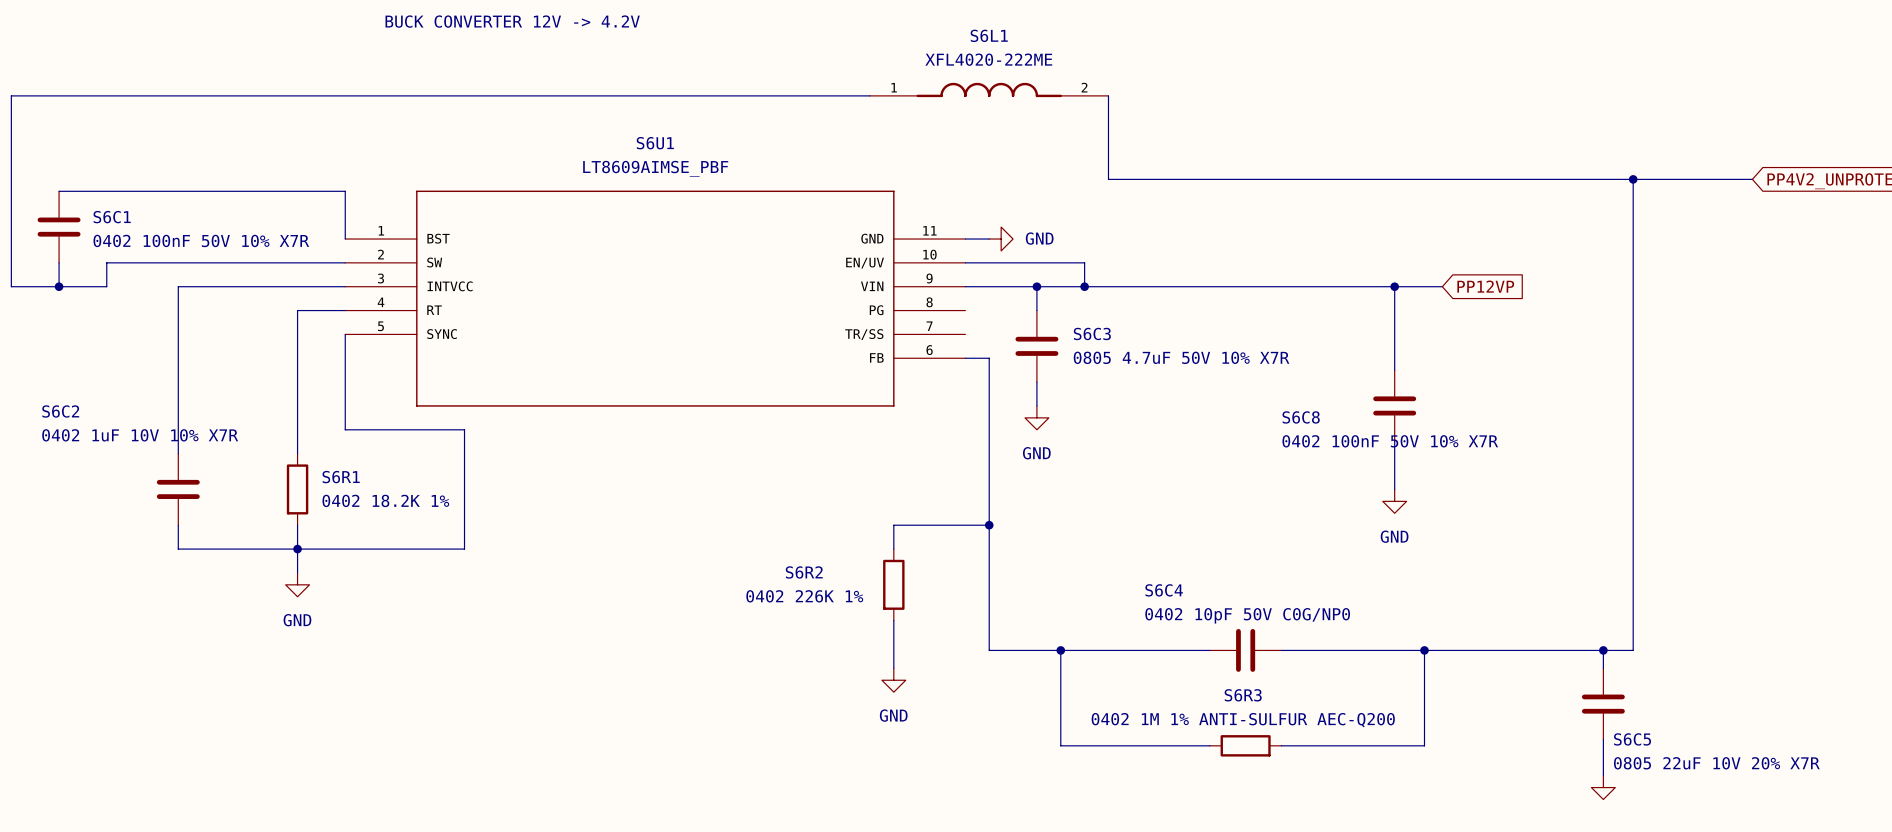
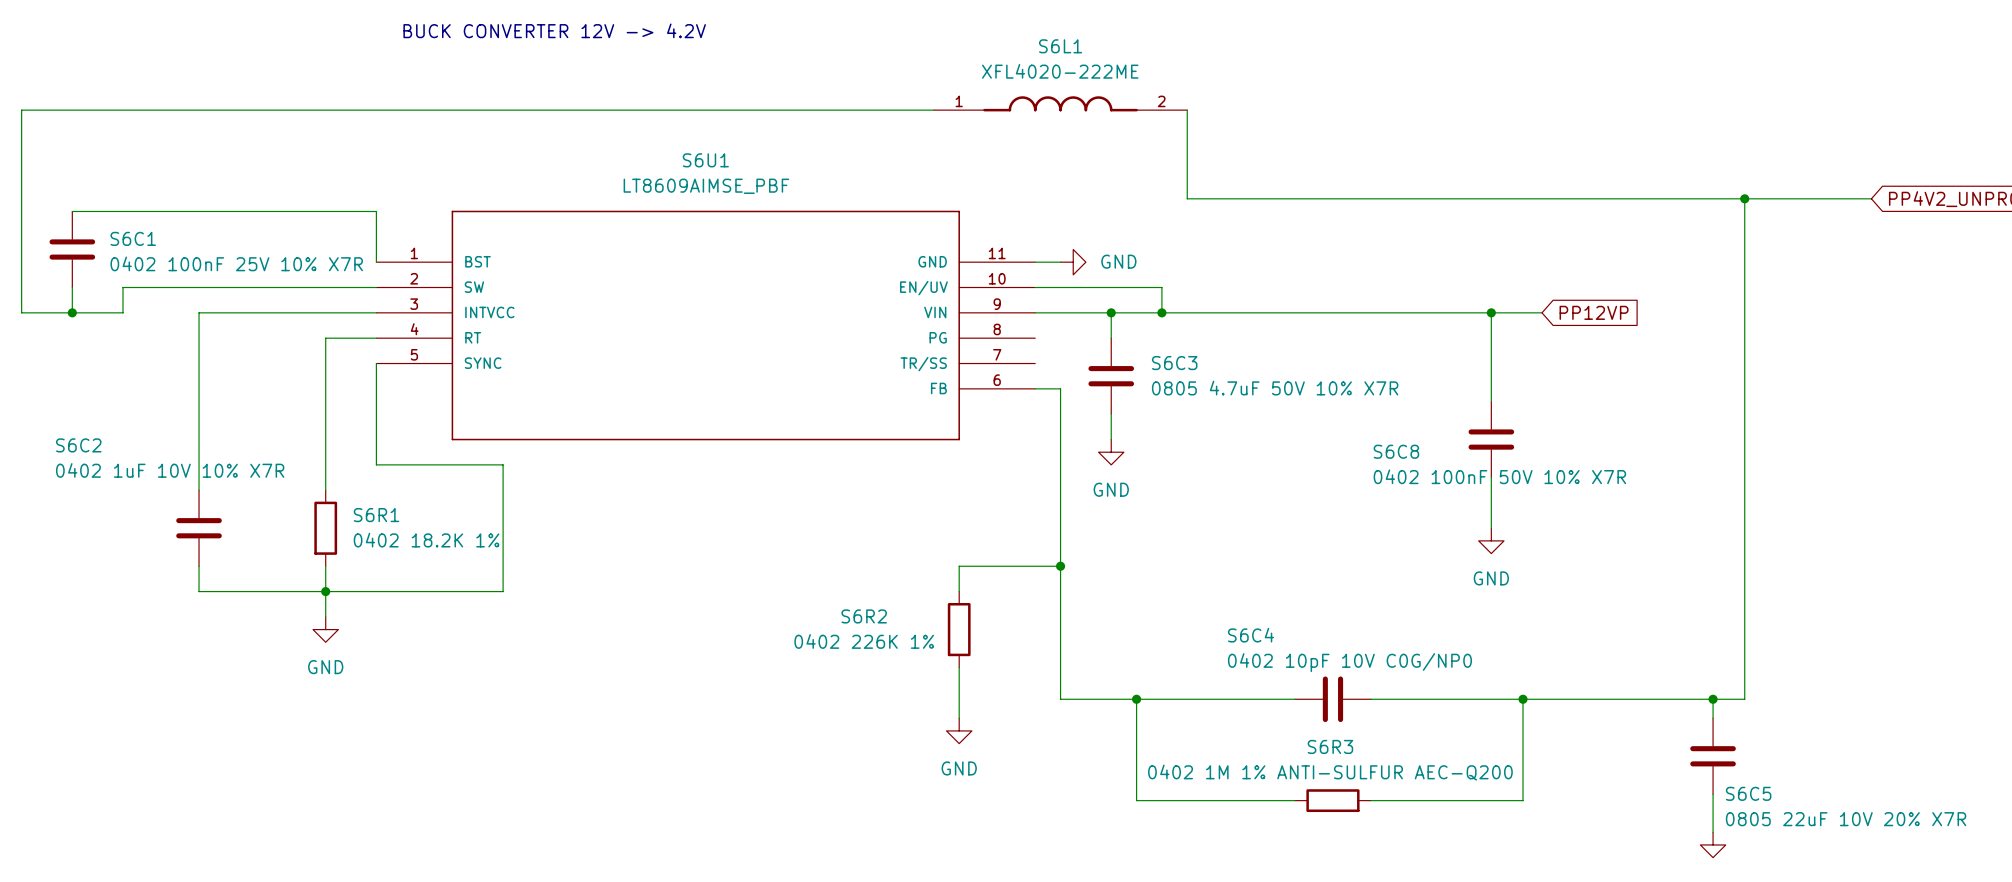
S6C1 value: 0402 100nF 50V 10% X7R (201, 240) -> 0402 100nF 25V 10% X7R (236, 263)
S6C4 value: 0402 10pF 50V C0G/NP0 (1247, 615) -> 0402 10pF 10V C0G/NP0 (1349, 662)

